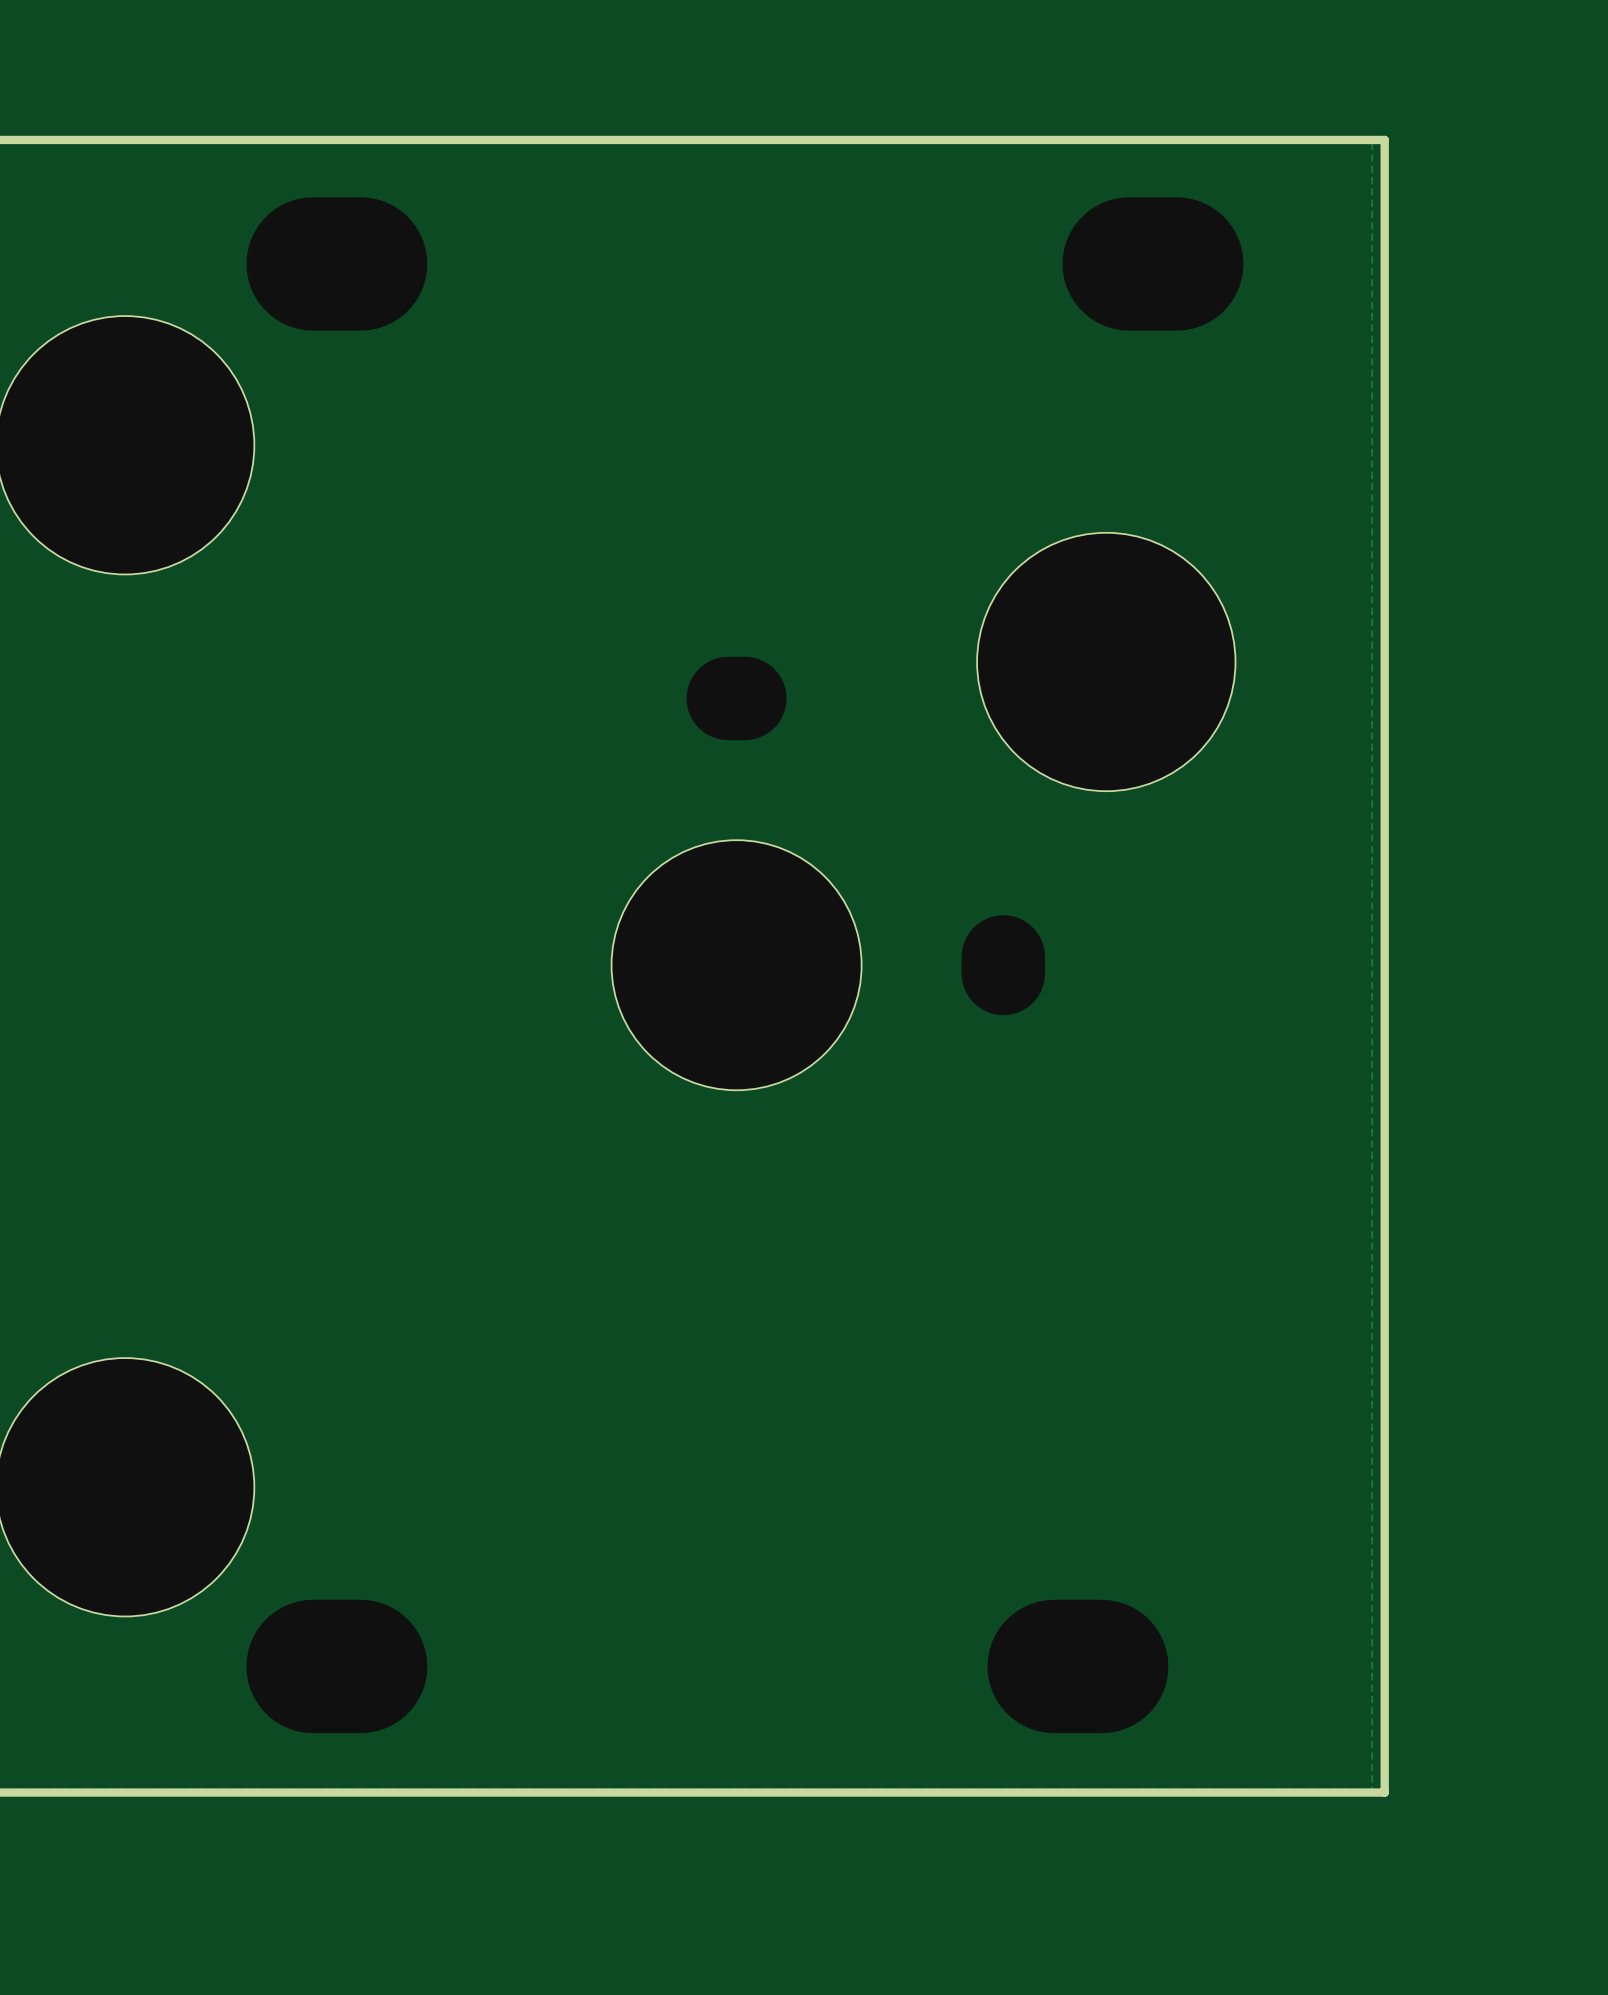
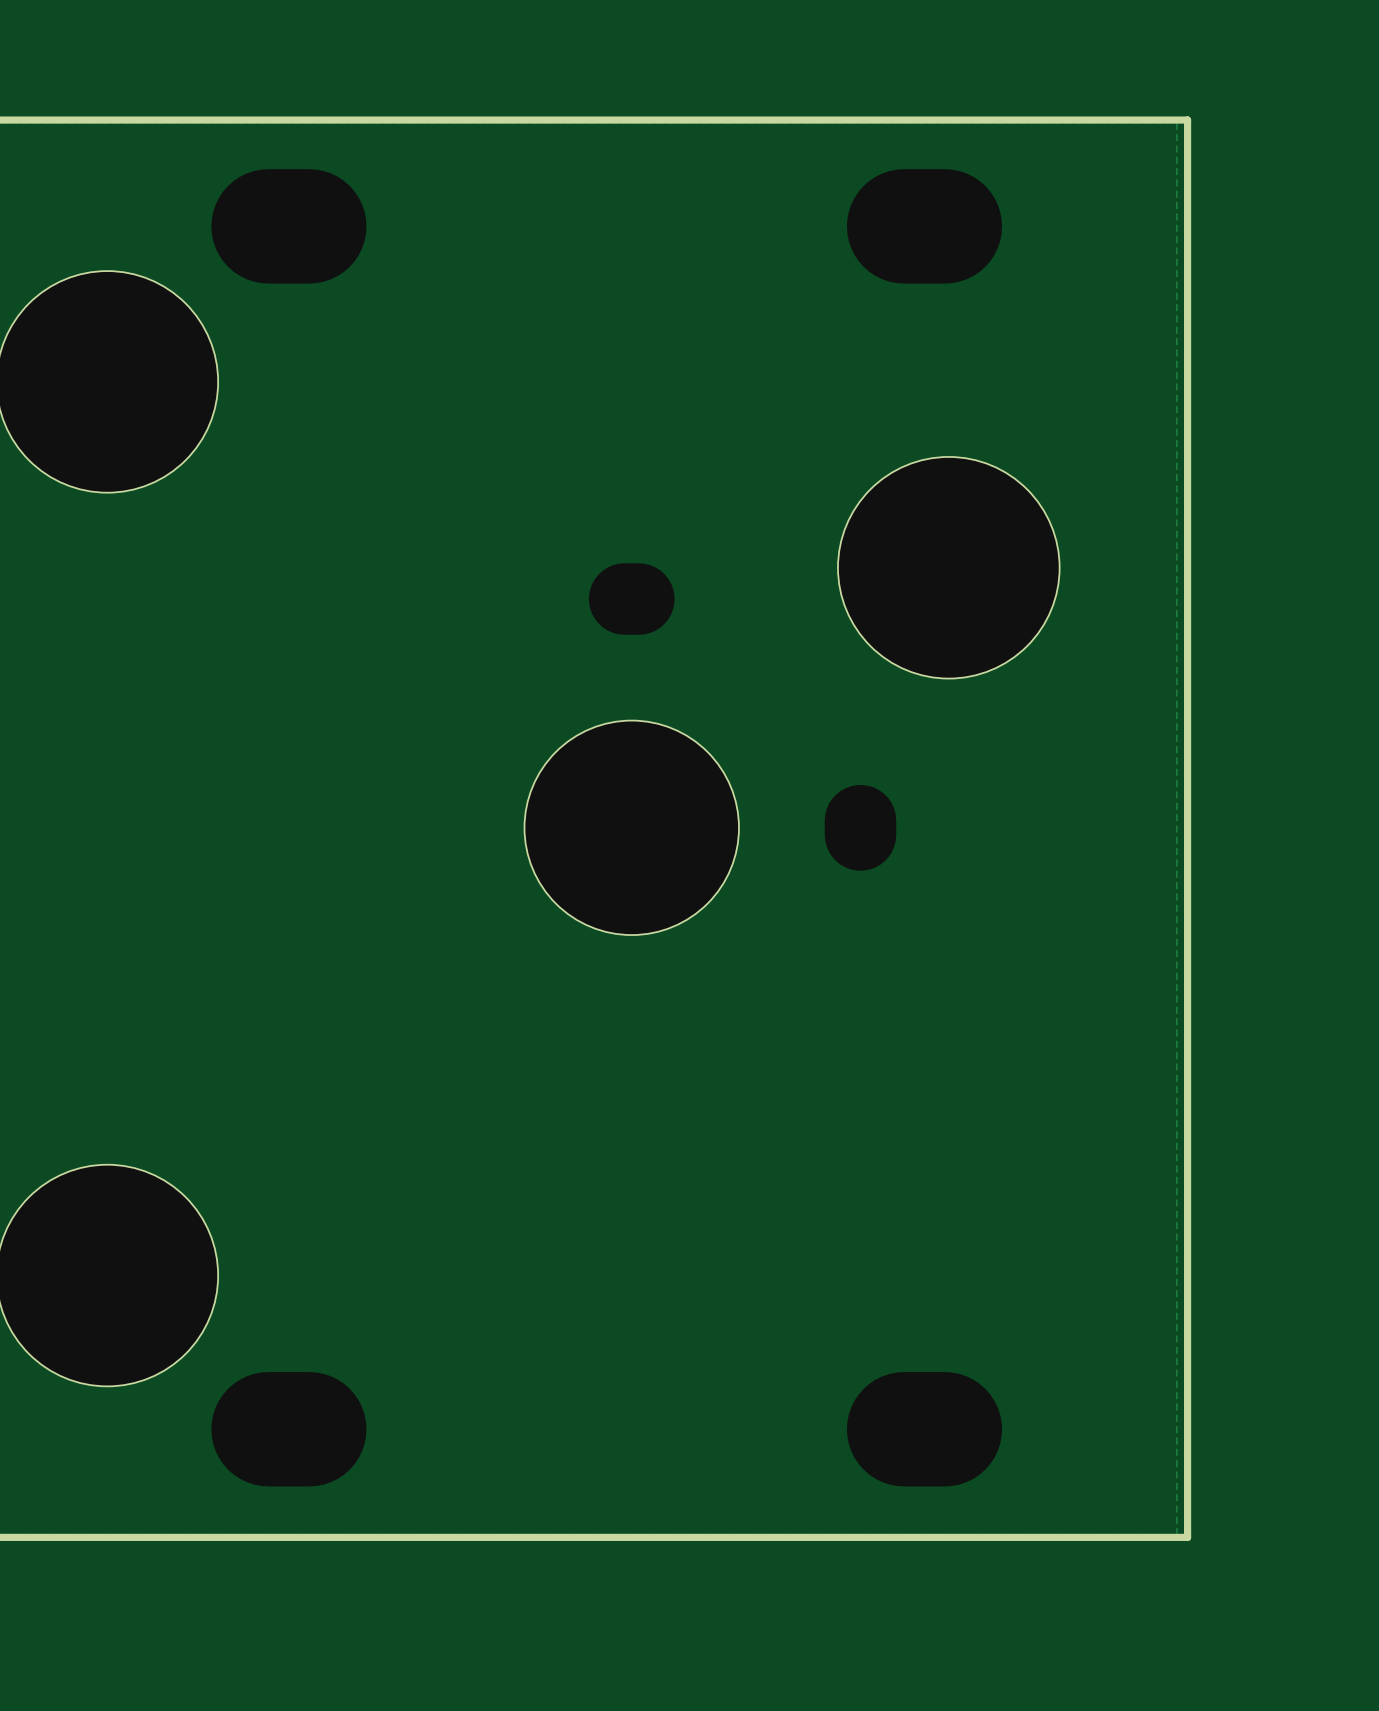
part position: (1152, 263) -> (924, 226)

